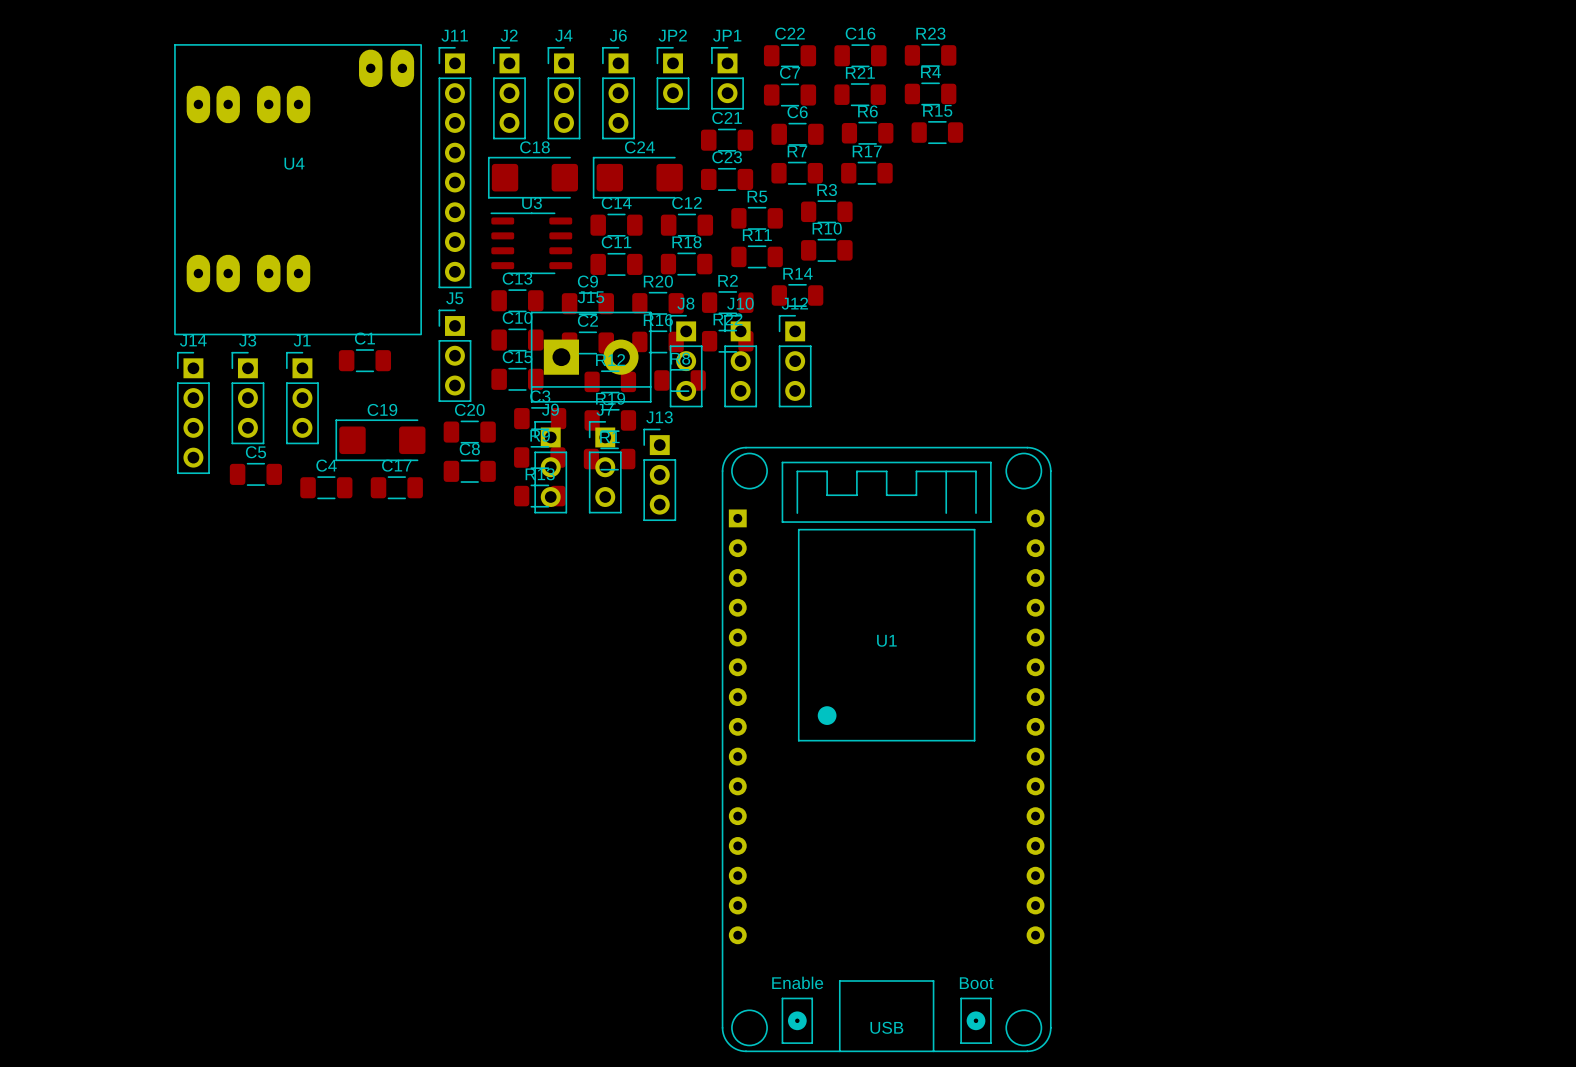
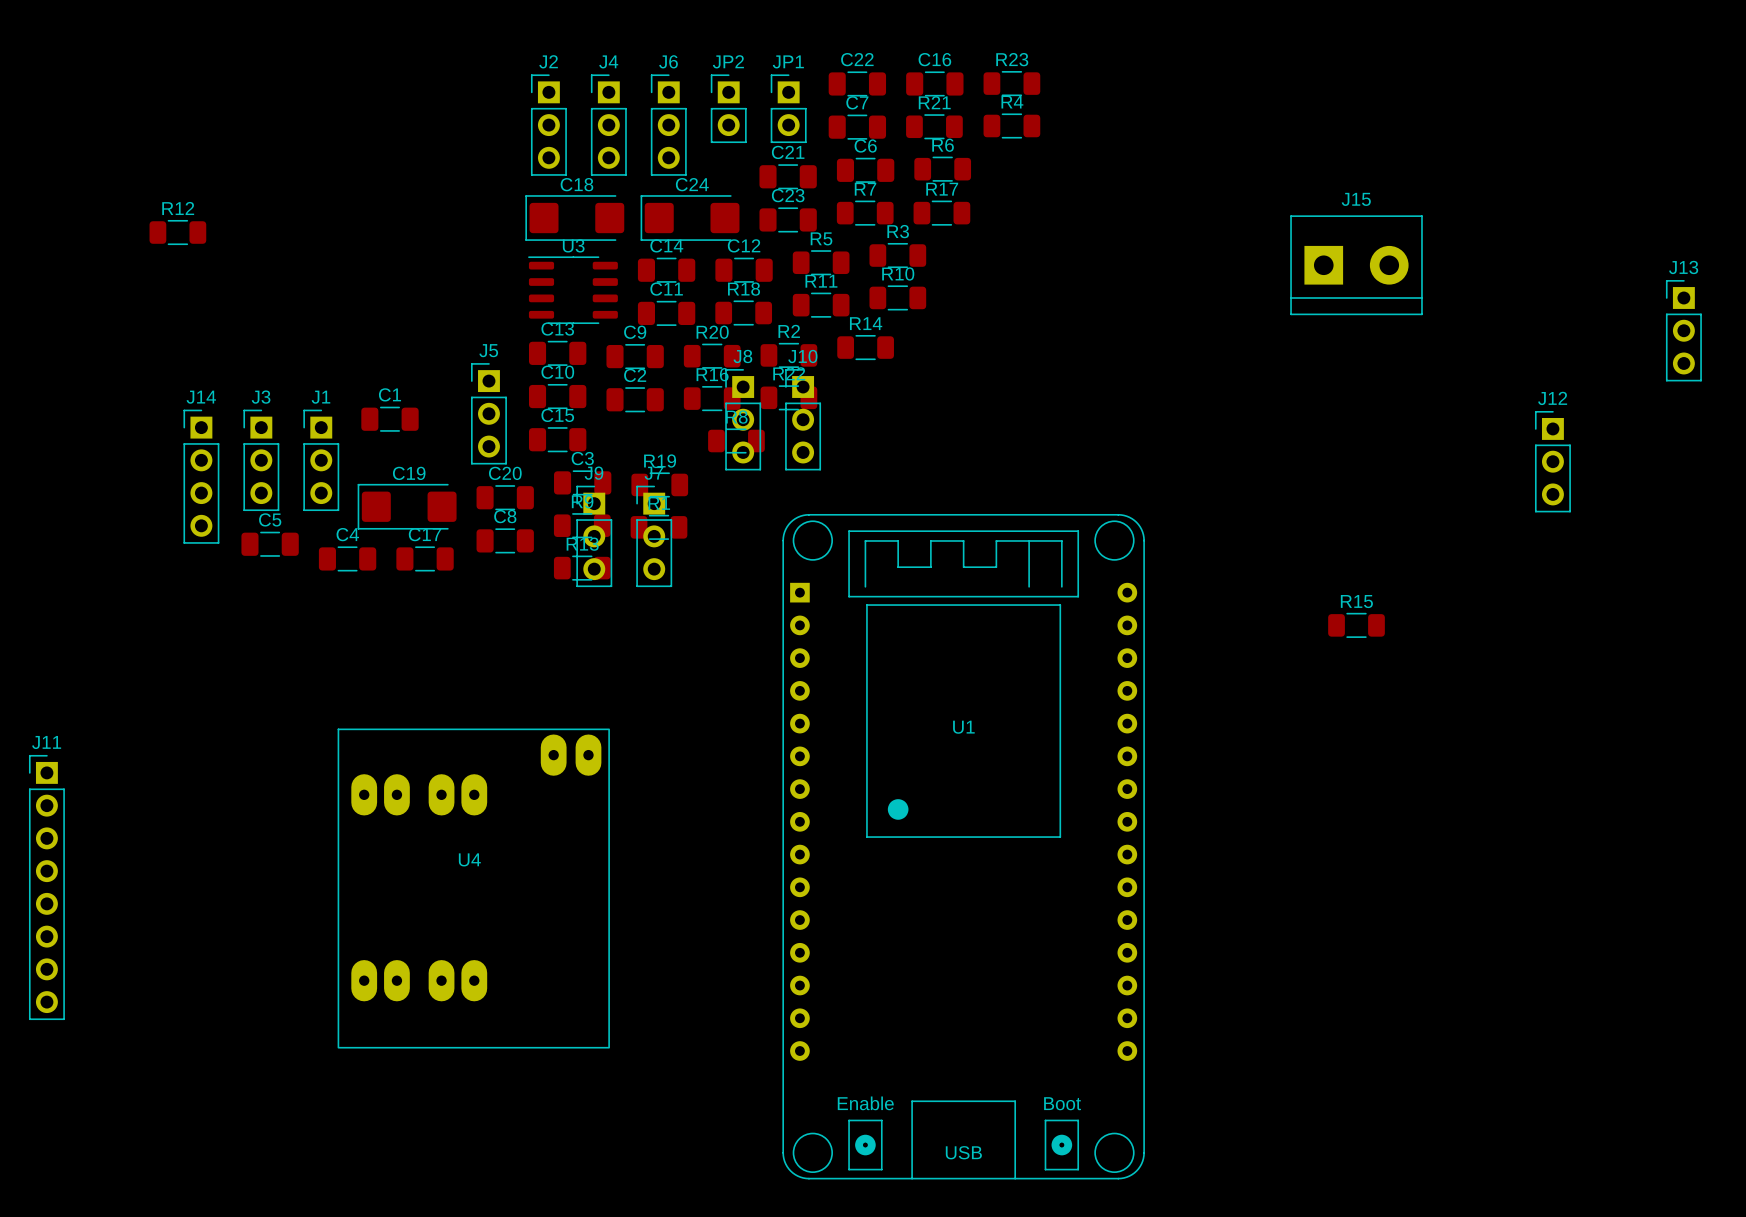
R15 position: (937, 132) -> (1356, 625)
J11 position: (454, 167) -> (46, 887)
U4 position: (298, 189) -> (473, 888)
J15 position: (591, 357) -> (1356, 265)
J12 position: (795, 361) -> (1552, 461)
R12 position: (610, 381) -> (177, 232)
J13 position: (659, 474) -> (1683, 330)

